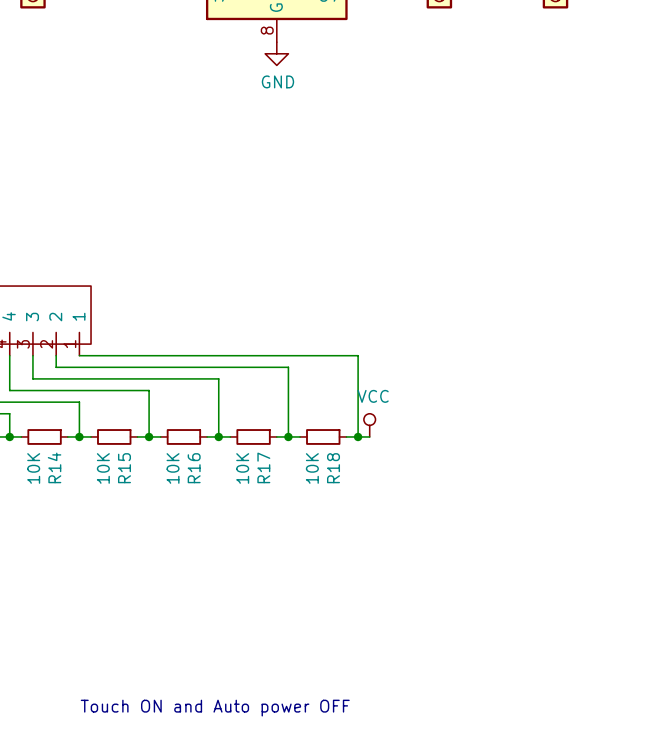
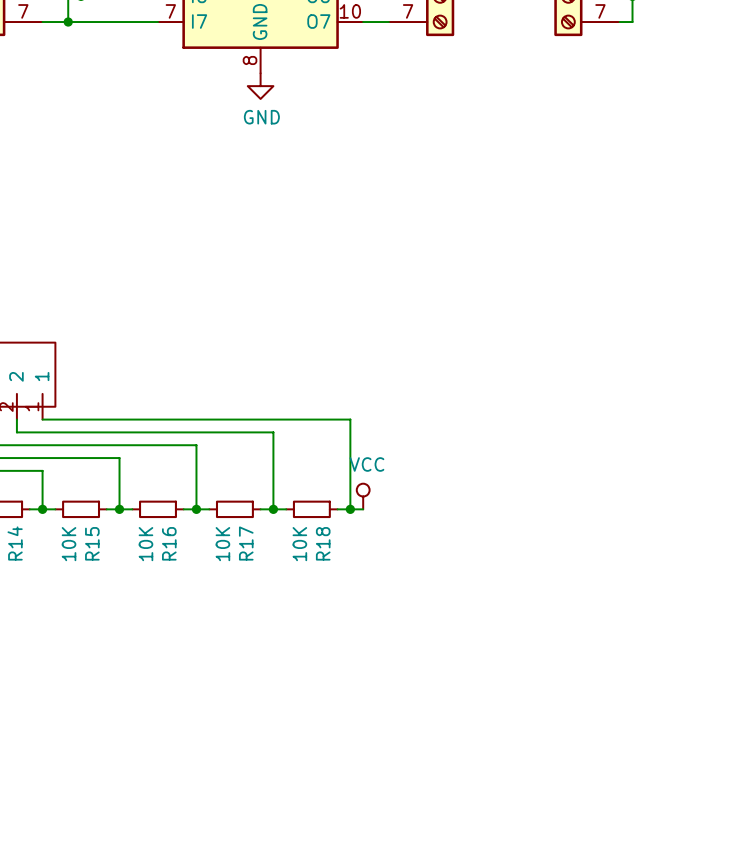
text: Touch ON and Auto power OFF (215, 708) -> none

